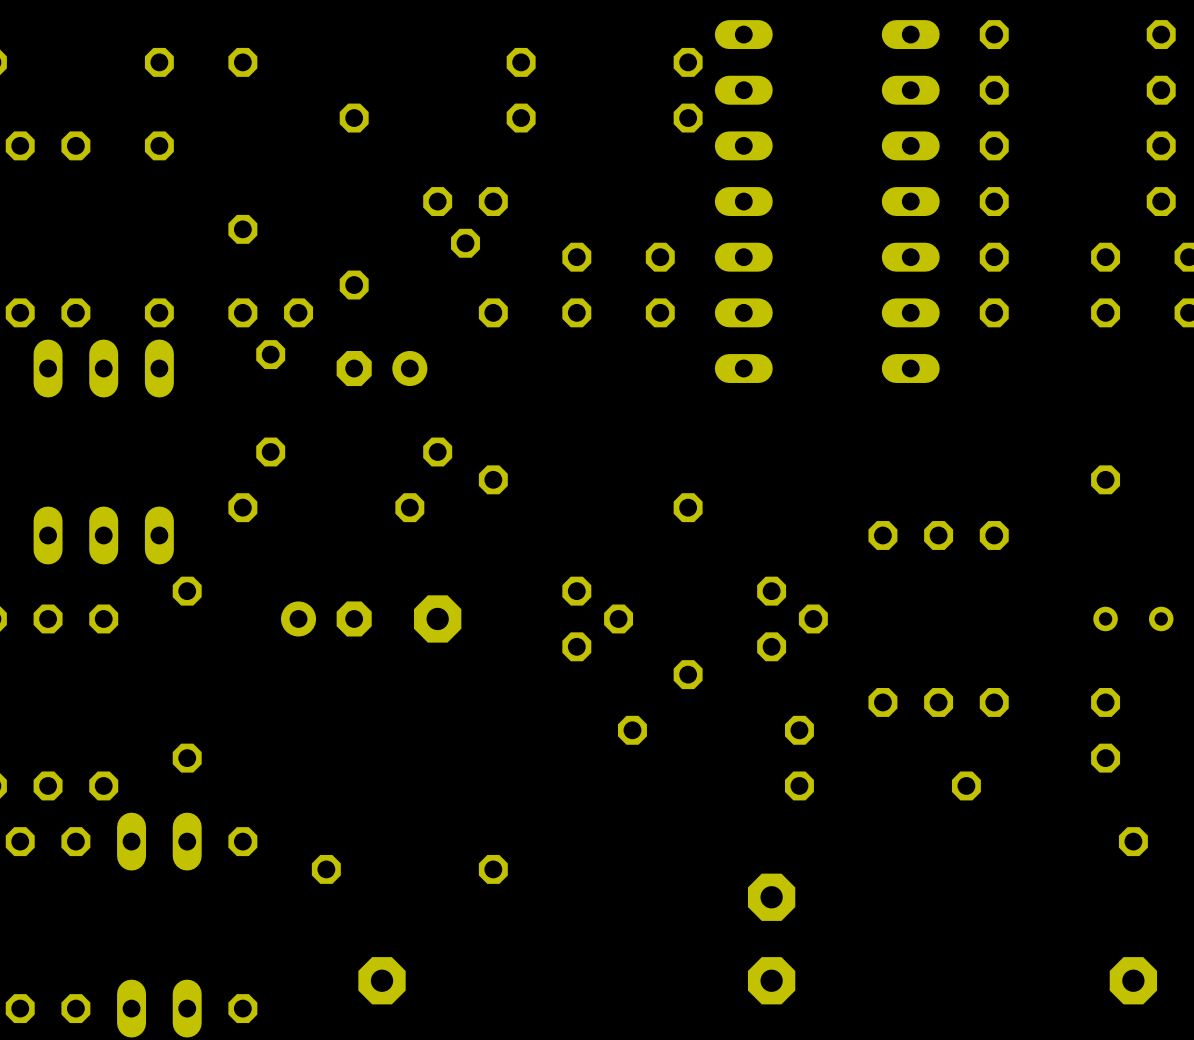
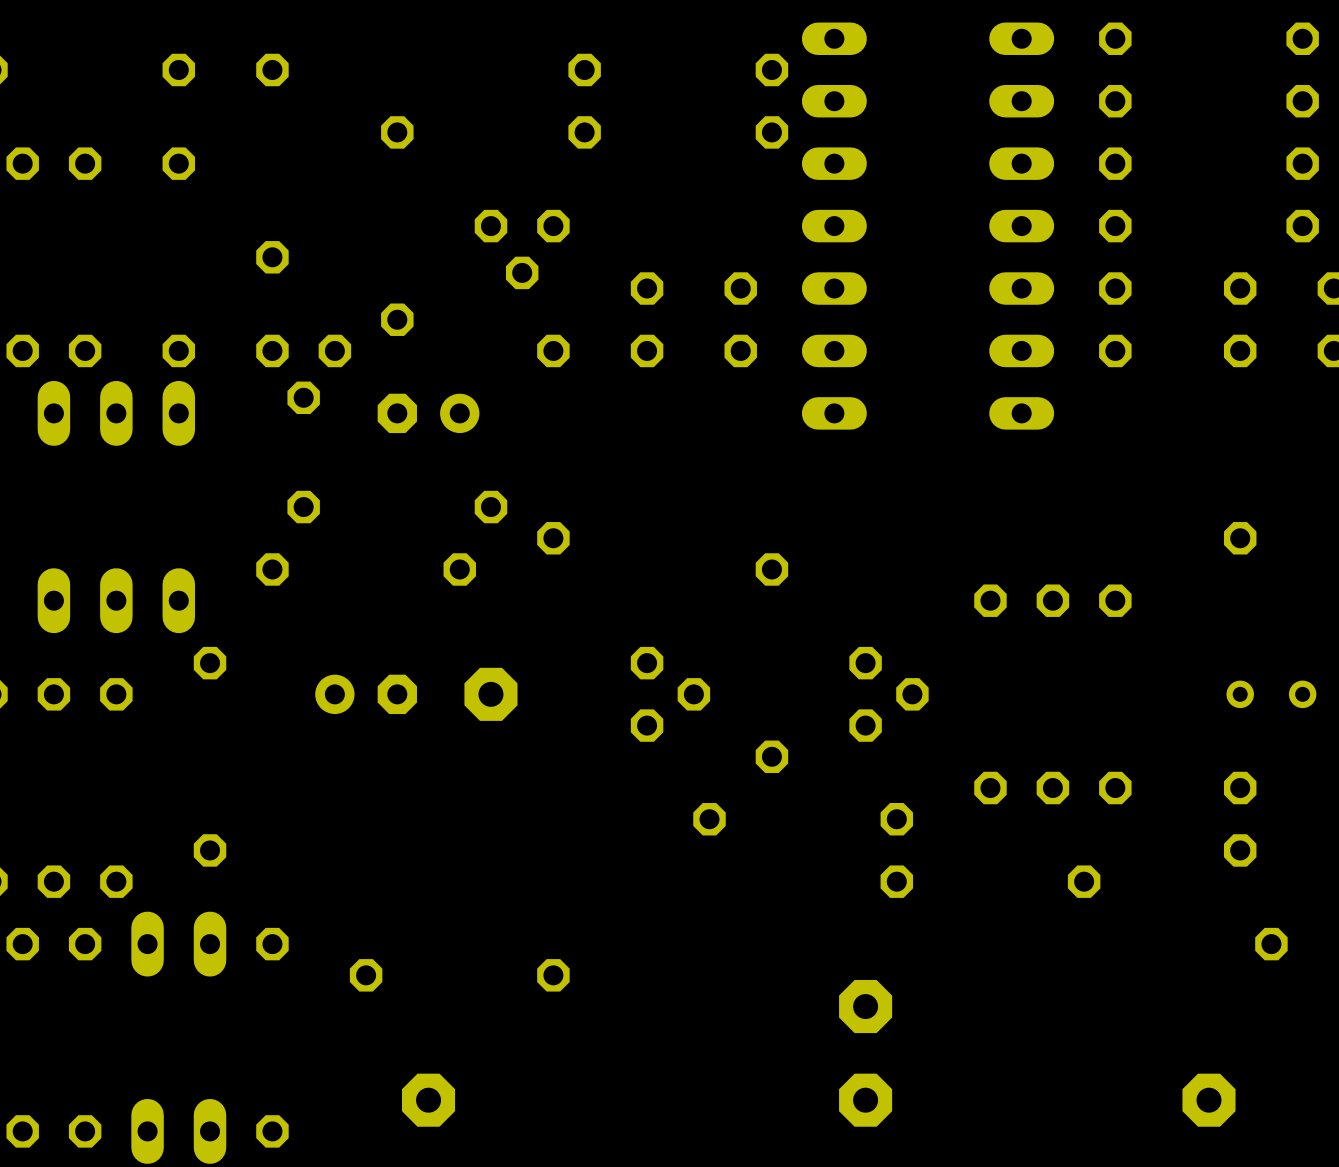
part position: (1133, 980) -> (1208, 1100)

